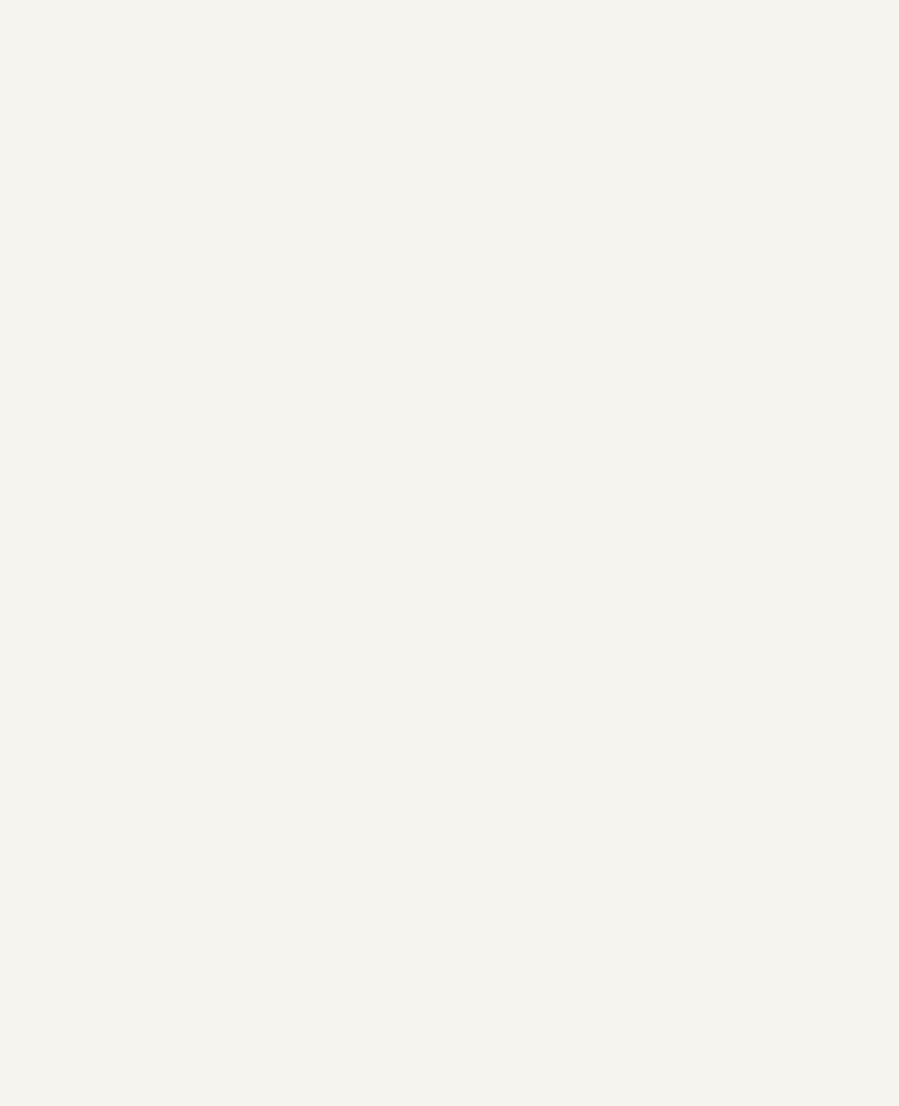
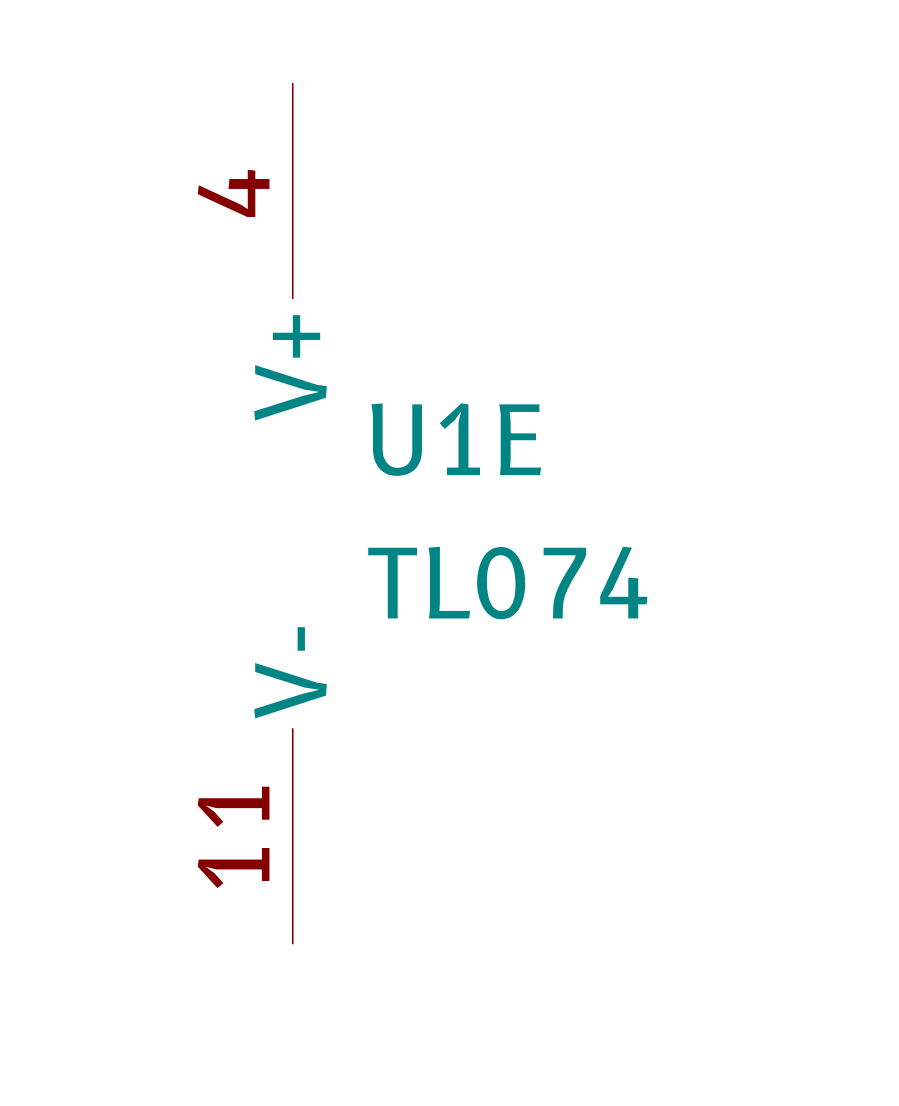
U1E: none -> TL074 (292, 513)

